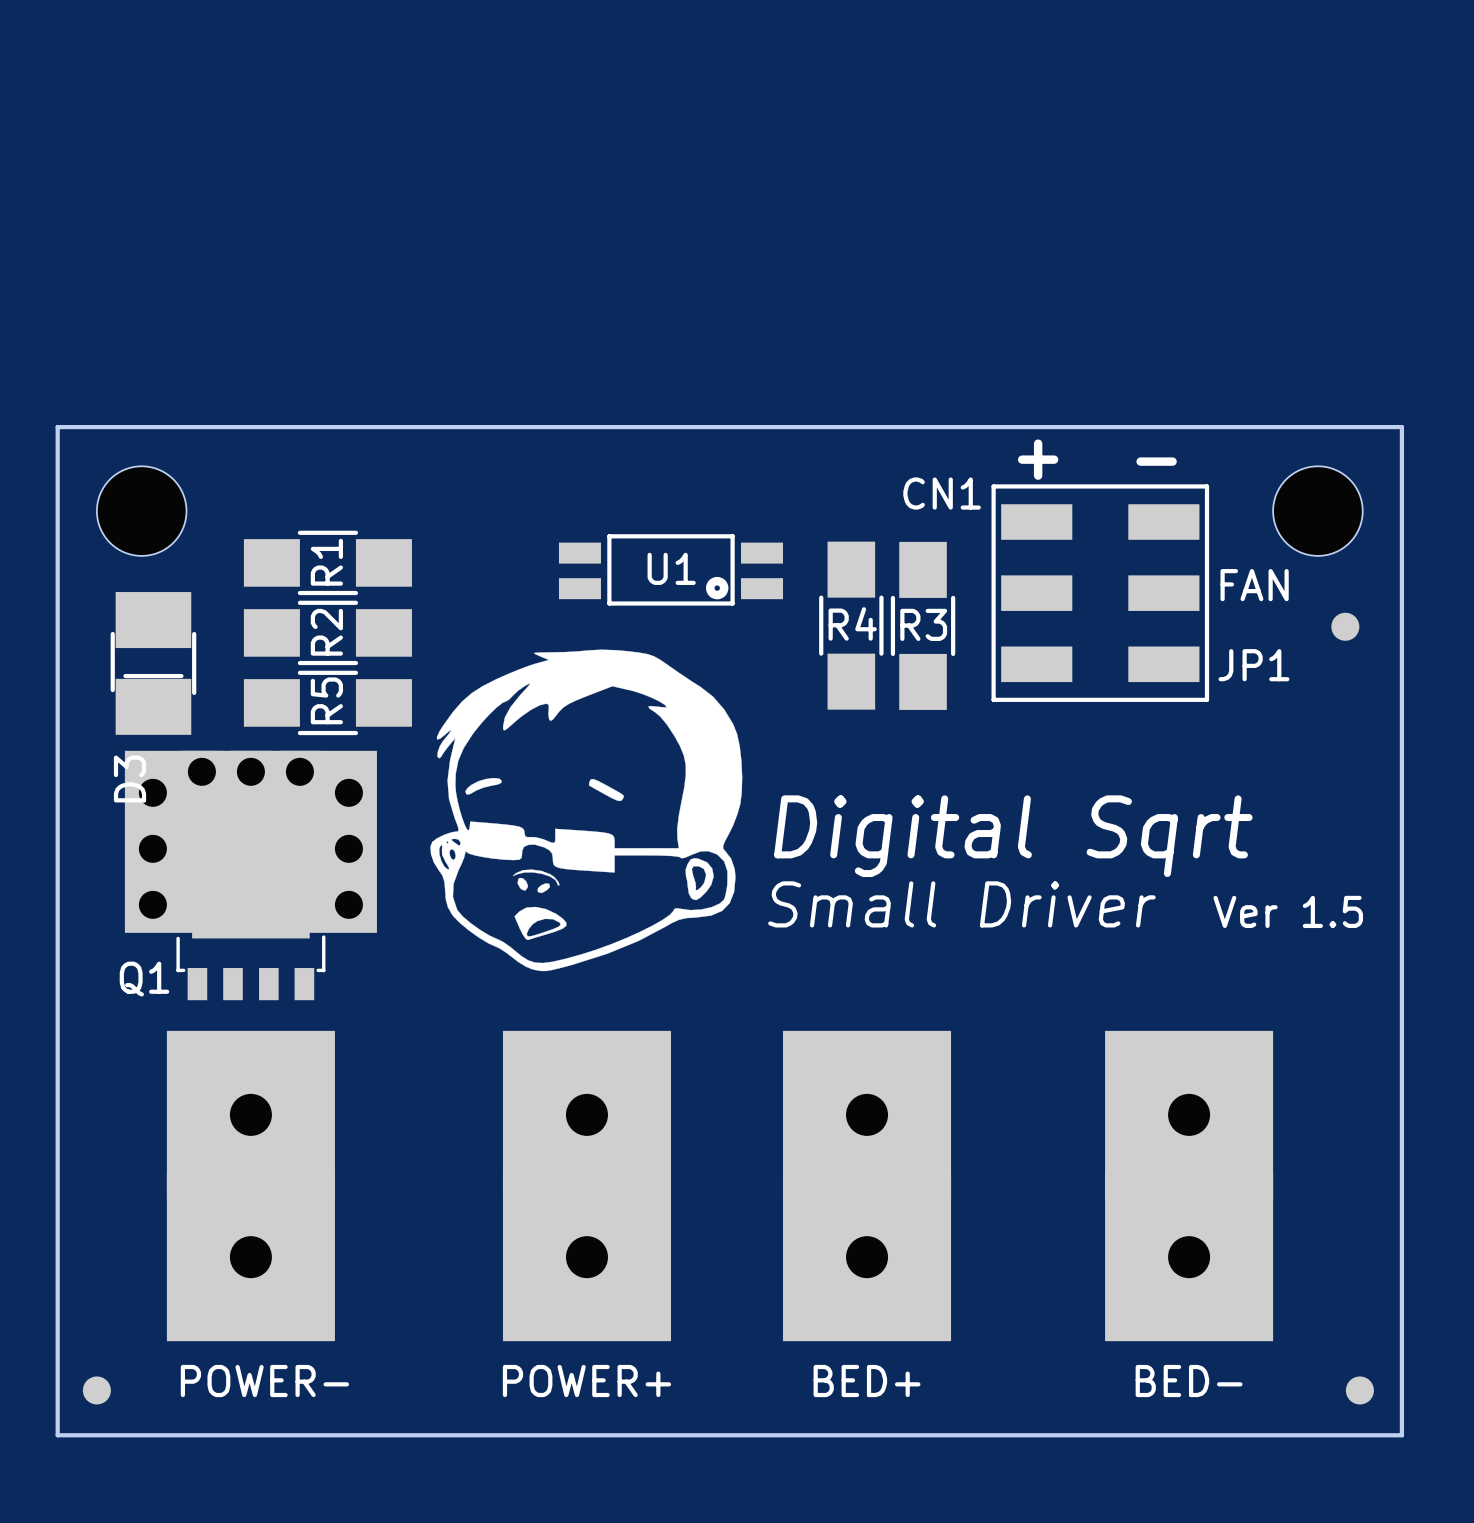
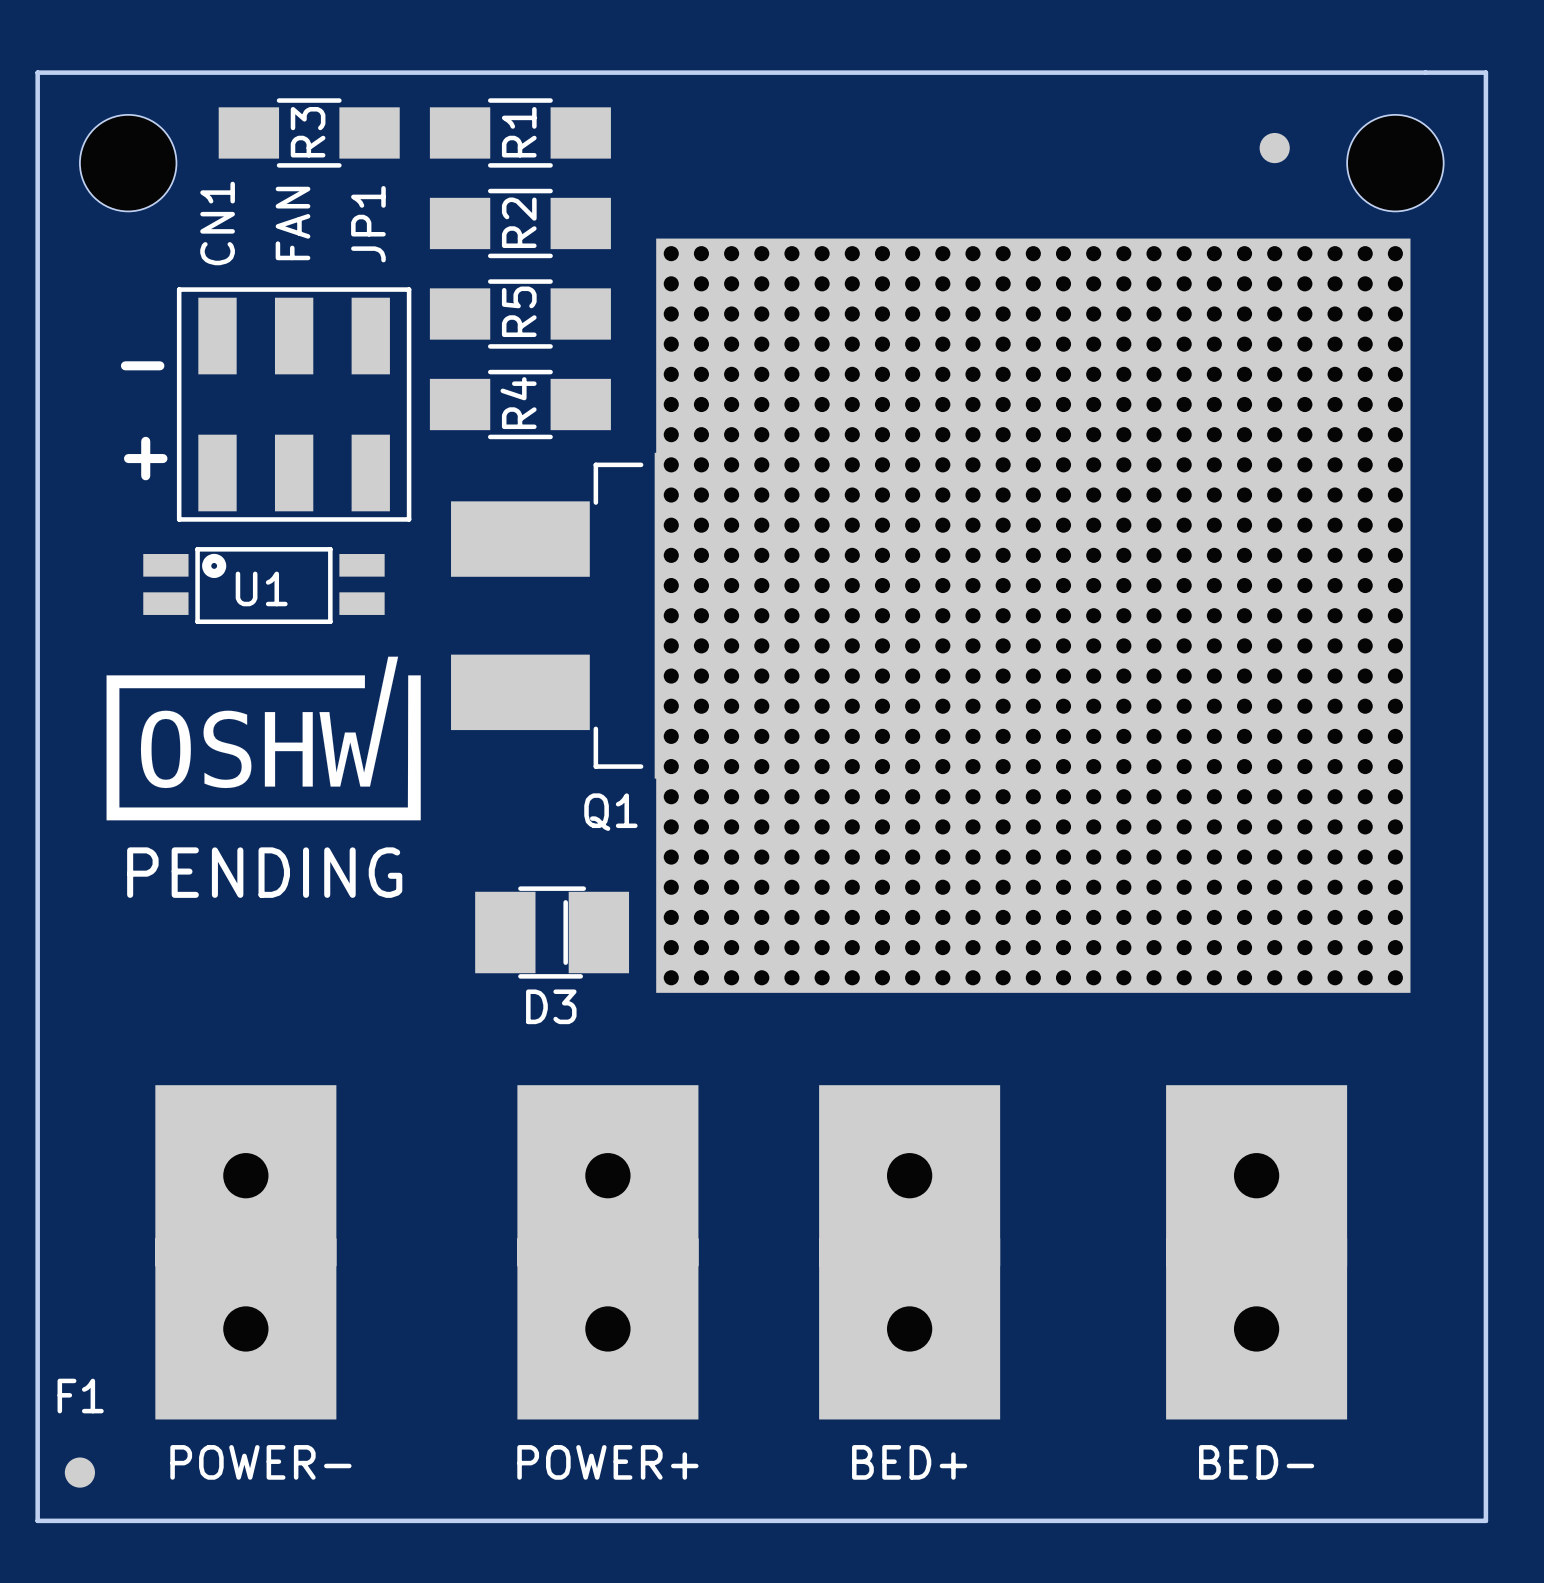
text: none -> FAN (293, 223)
text: none -> JP1 (368, 224)
text: none -> - (142, 365)
board edge: (57, 427) (1401, 427) -> (37, 434) (37, 72) (1485, 72) (1485, 434)
text: none -> + (145, 458)
text: + (1038, 459) -> none
text: - (1156, 461) -> none
CN1 name position: CN1 (942, 493) -> CN1 (217, 223)
part position: (141, 511) -> (128, 163)
part position: (1317, 511) -> (1395, 163)
R1 position: (327, 562) -> (520, 132)
U1 rotation: 0° (670, 569) -> 180° (263, 585)
U1 position: (670, 569) -> (263, 585)
text: FAN (1254, 585) -> none
CN1 rotation: 0° (1100, 593) -> 90° clockwise (294, 404)
CN1 position: (1100, 593) -> (294, 404)
R4 rotation: 0° (851, 625) -> 90° clockwise (520, 404)
R4 position: (851, 625) -> (520, 404)
R3 rotation: 0° (923, 625) -> 90° clockwise (309, 132)
R3 position: (923, 625) -> (309, 132)
part position: (1345, 626) -> (1274, 148)
R2 position: (327, 632) -> (520, 223)
drawing: none -> [106, 656, 421, 821]
drawing: [430, 649, 743, 972] -> none
D3 rotation: 0° (153, 663) -> 90° counterclockwise (552, 932)
D3 position: (153, 663) -> (552, 932)
text: JP1 (1253, 665) -> none
R5 position: (327, 702) -> (520, 314)
Q1 footprint: [124, 750, 377, 1001] -> [451, 238, 1411, 993]
text: Digital Sqrt (1013, 836) -> none
text: Small Driver (961, 904) -> none
text: Ver 1.5 (1288, 911) -> none
Q1 name position: Q1 (144, 979) -> Q1 (610, 812)
F1 name: none -> F1 (80, 1396)
part: (1359, 1390) -> none

